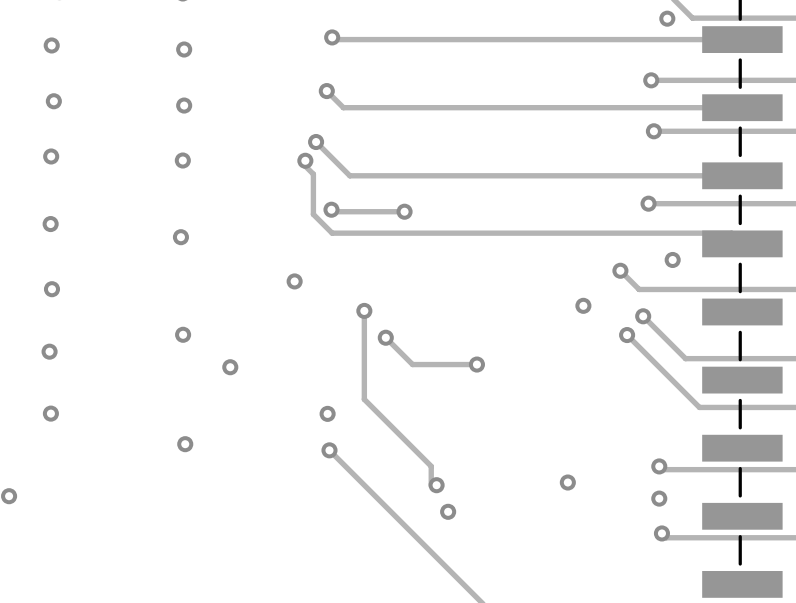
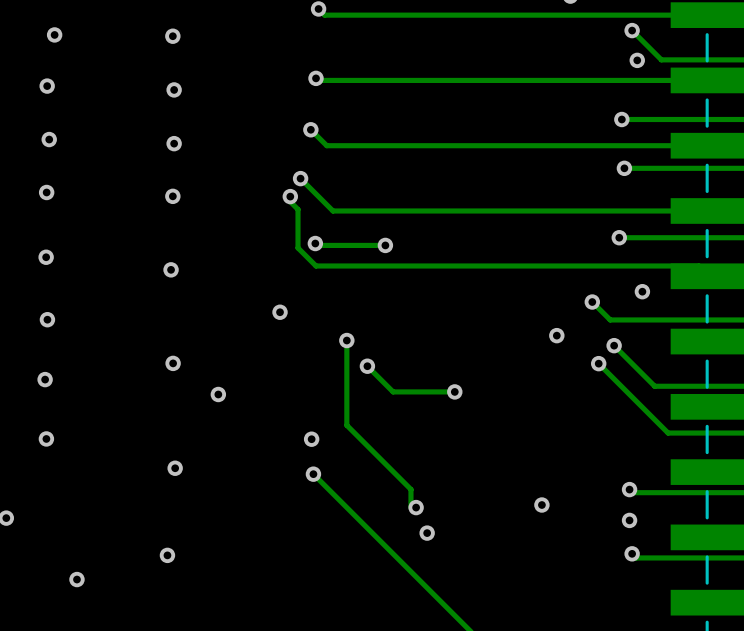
via: none -> (167, 555)
via: none -> (76, 579)

